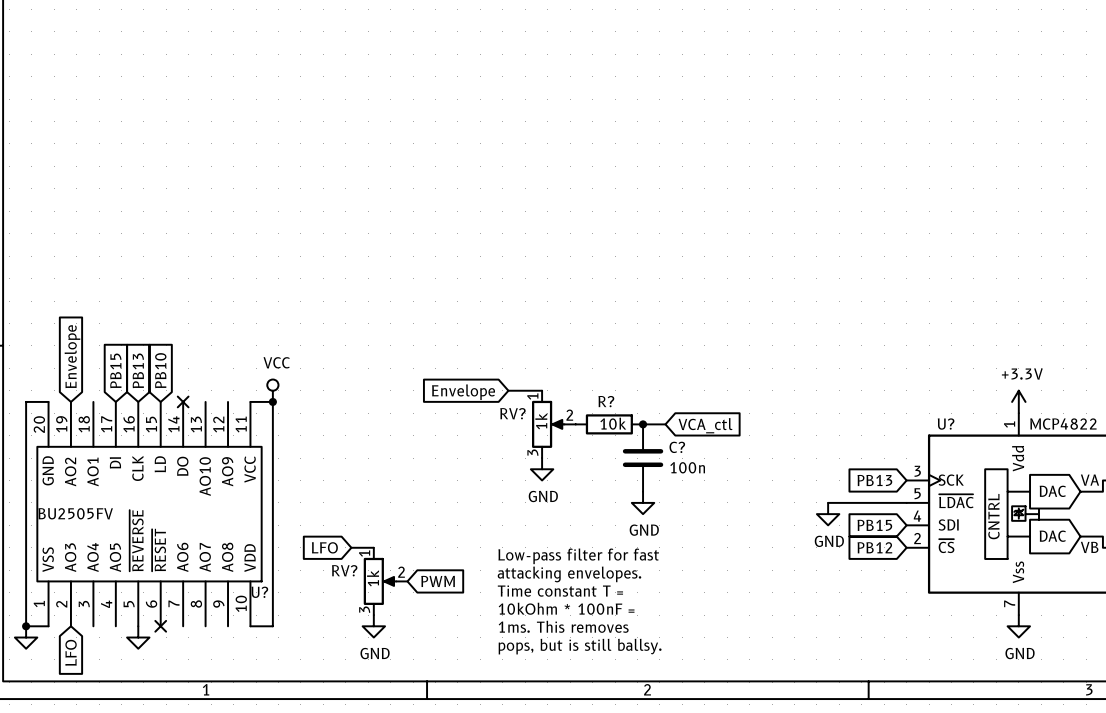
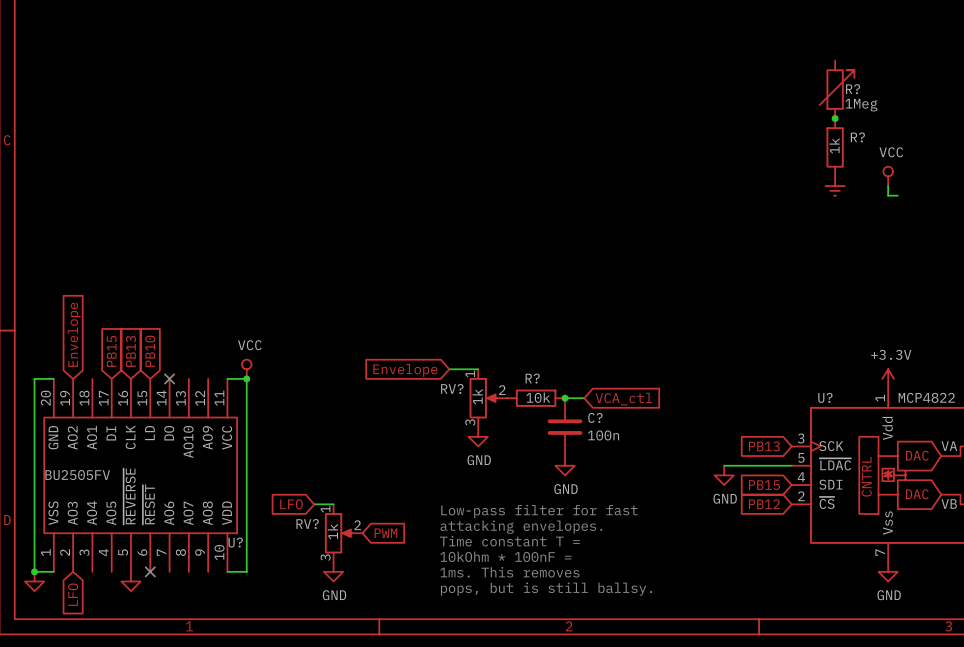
R?: none -> 1Meg (837, 89)
junction: none -> (835, 118)
R?: none -> 1k (835, 147)
power symbol: none -> VCC (888, 176)
power symbol: none -> (835, 186)
wire: none -> (888, 186) (888, 195) (897, 195)

